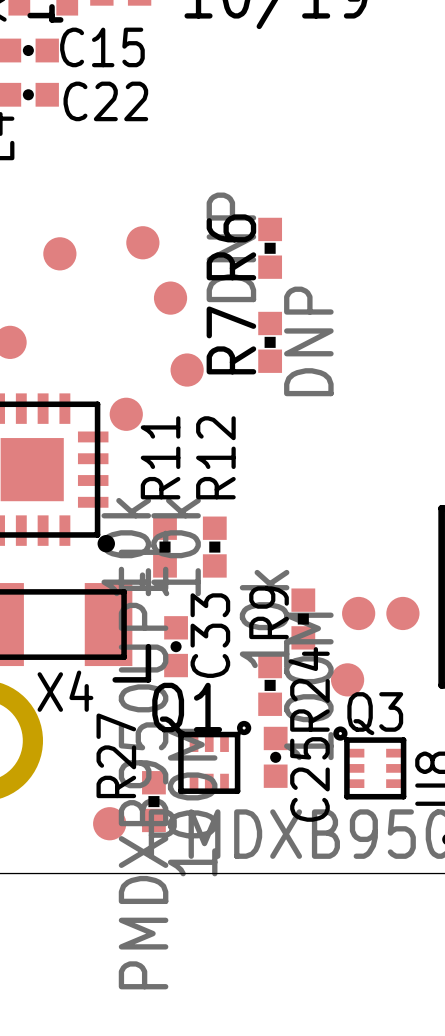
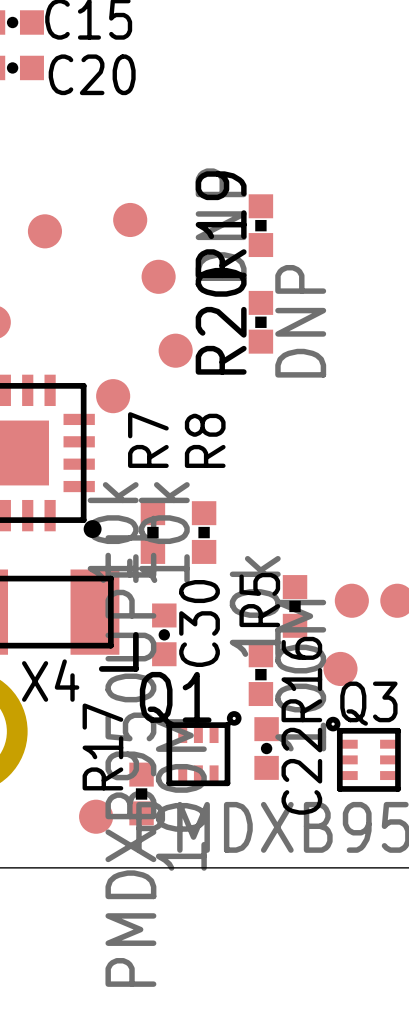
C22 name: C22 (105, 101) -> C20 (92, 74)
R6 name: R6 (231, 247) -> R19 (221, 224)
R7 name: R7 (231, 340) -> R20 (221, 321)
R11 name: R11 (160, 457) -> R7 (148, 440)
R12 name: R12 (215, 457) -> R8 (205, 440)
R9 name: R9 (269, 612) -> R5 (259, 599)
C33 name: C33 (210, 635) -> C30 (199, 623)
R24 name: R24 (309, 689) -> R16 (301, 679)
R27 name: R27 (116, 755) -> R17 (102, 746)
C25 name: C25 (309, 779) -> C22 (301, 771)

